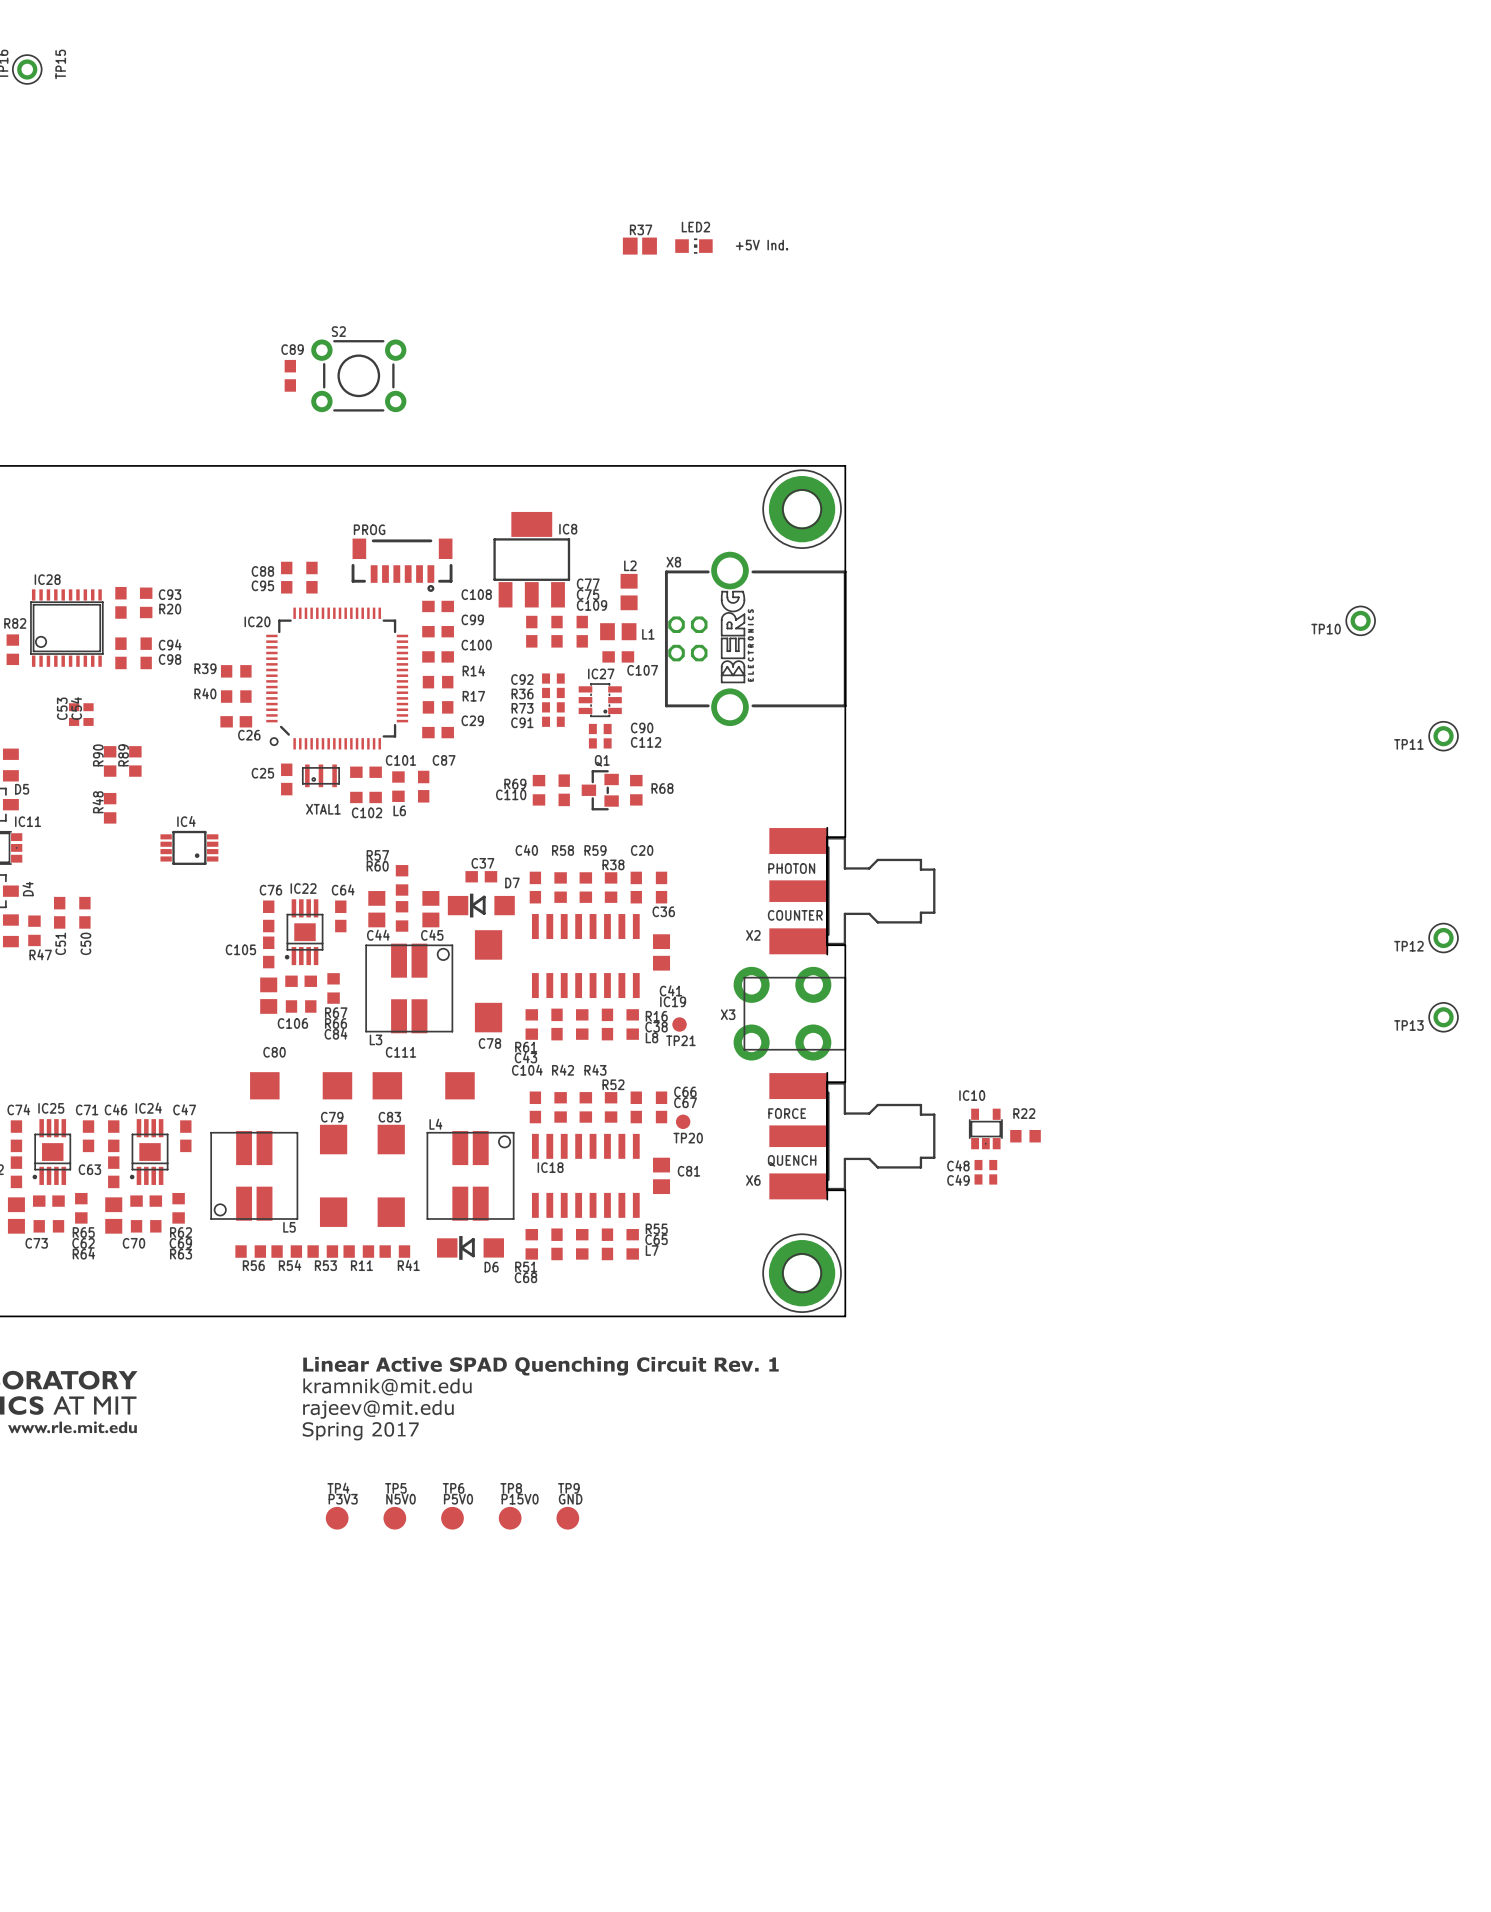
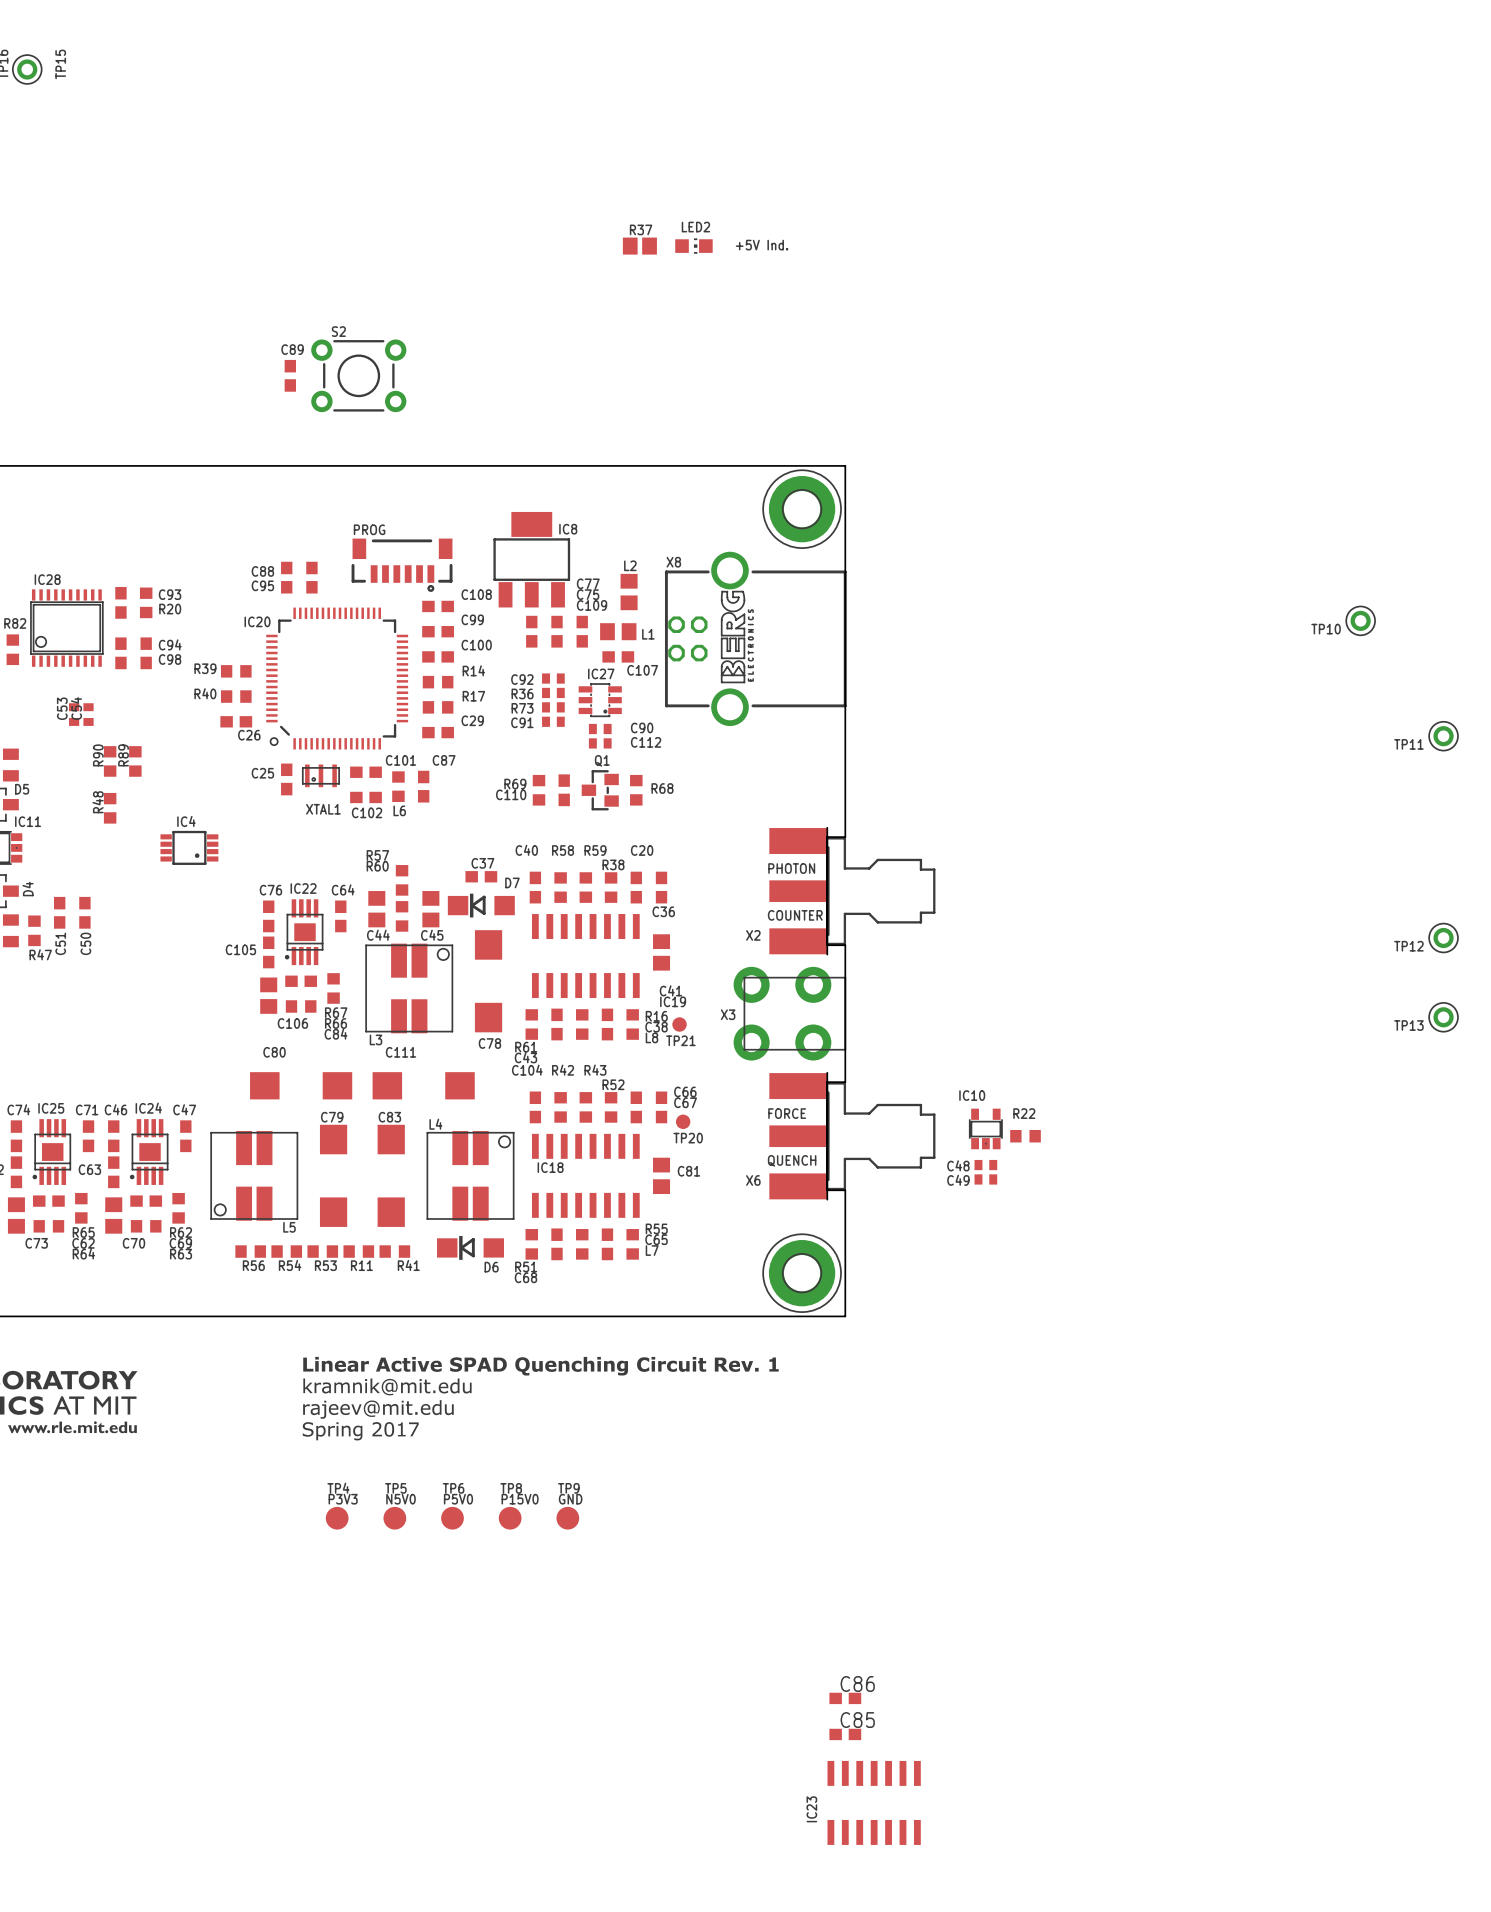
C86: none -> (845, 1698)
C85: none -> (845, 1734)
IC23: none -> (874, 1802)

